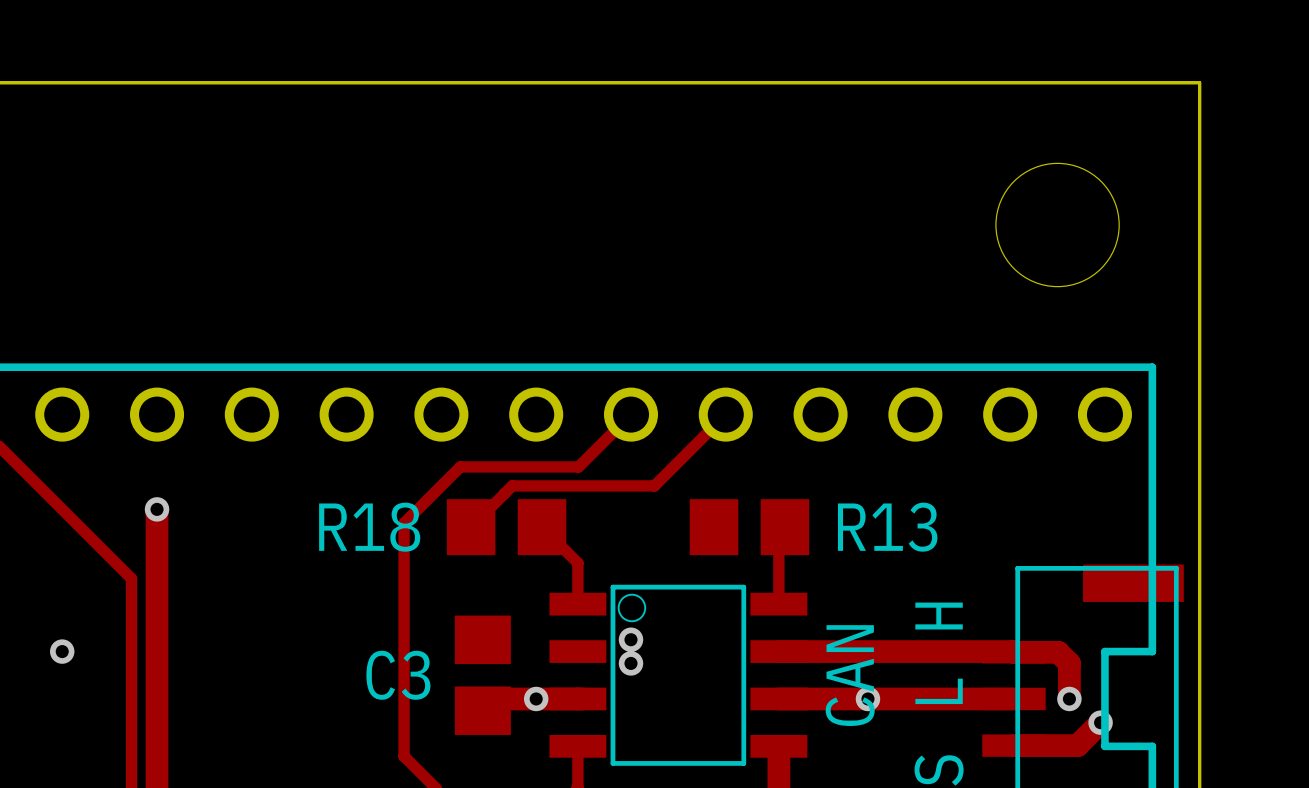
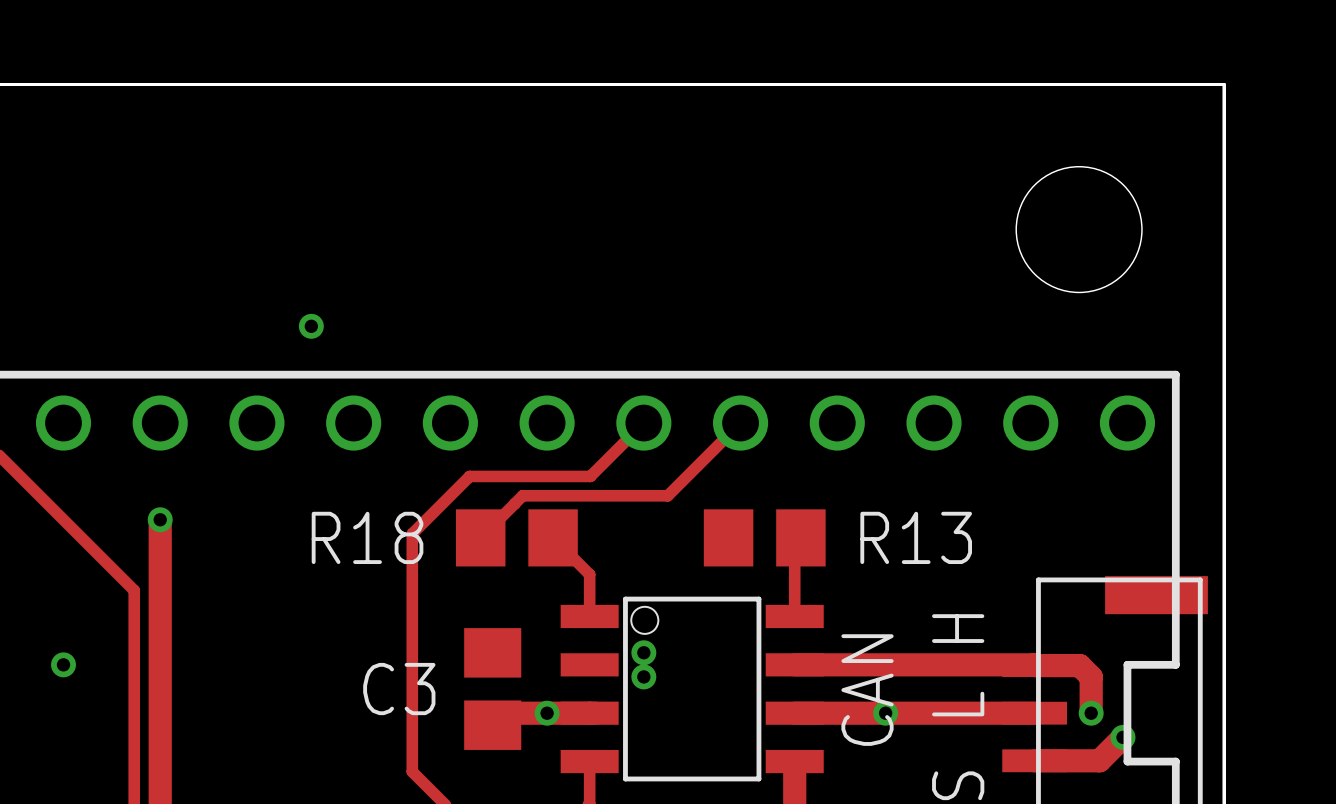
via: none -> (311, 326)

